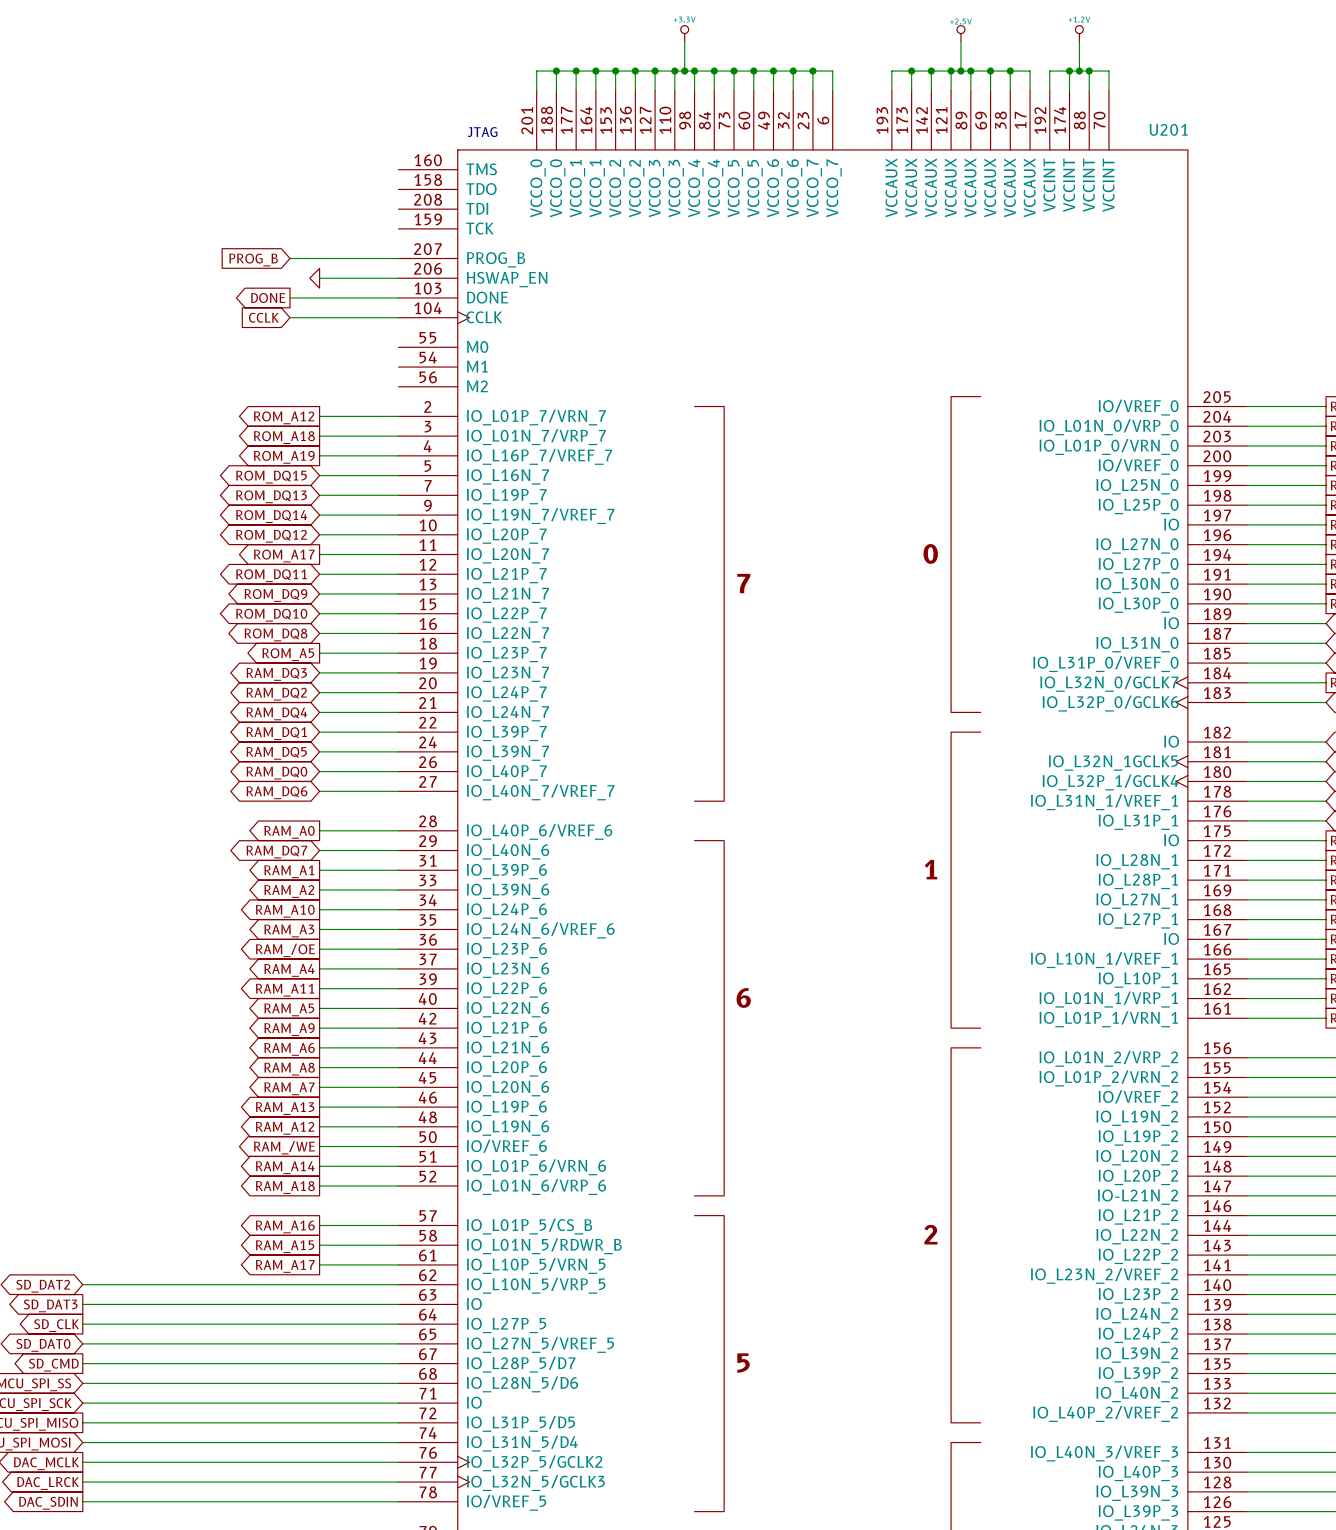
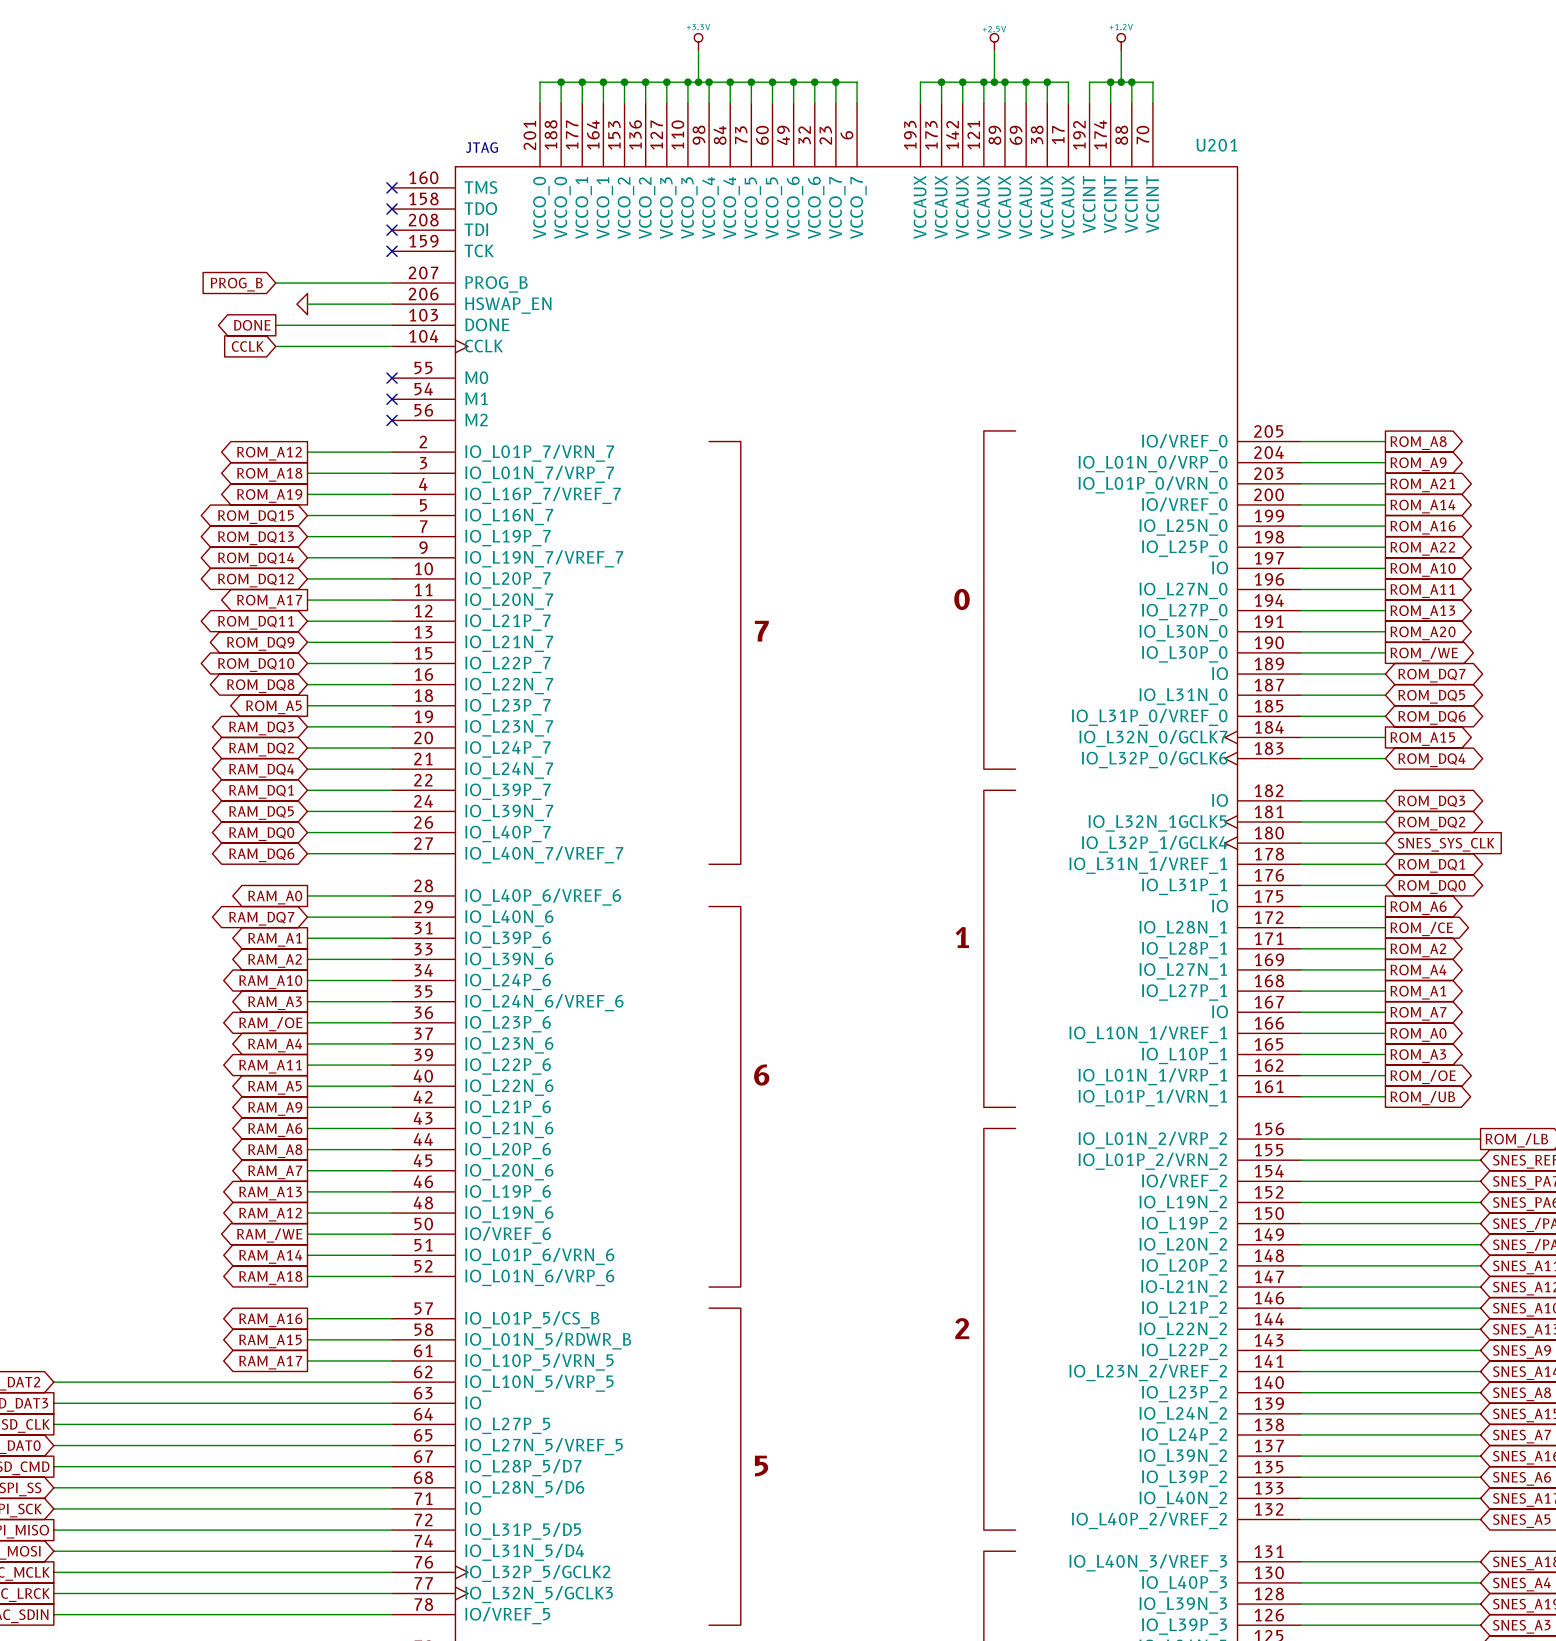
no-connect mark: none -> (392, 187)
no-connect mark: none -> (392, 209)
no-connect mark: none -> (392, 230)
no-connect mark: none -> (392, 251)
no-connect mark: none -> (392, 378)
no-connect mark: none -> (392, 399)
no-connect mark: none -> (392, 420)

